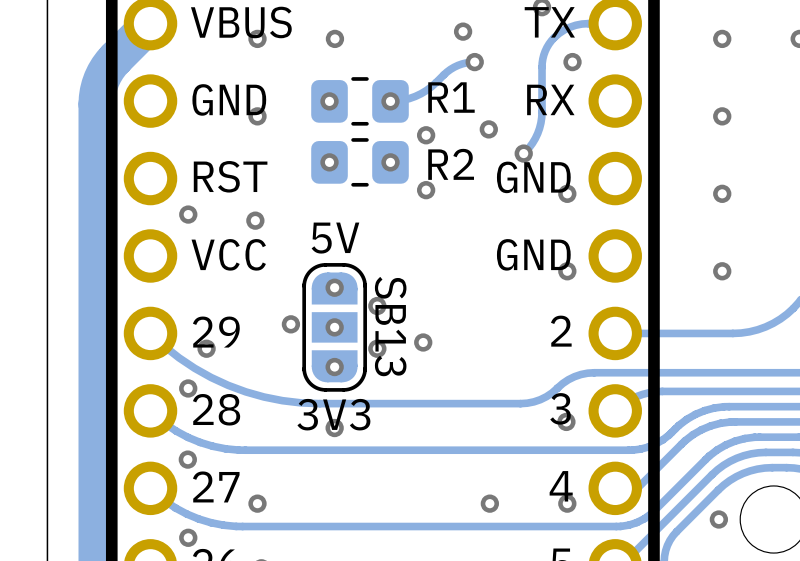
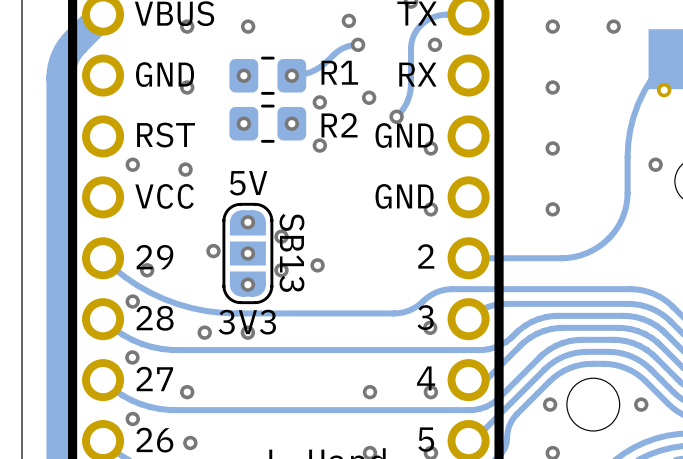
via: none -> (204, 332)

